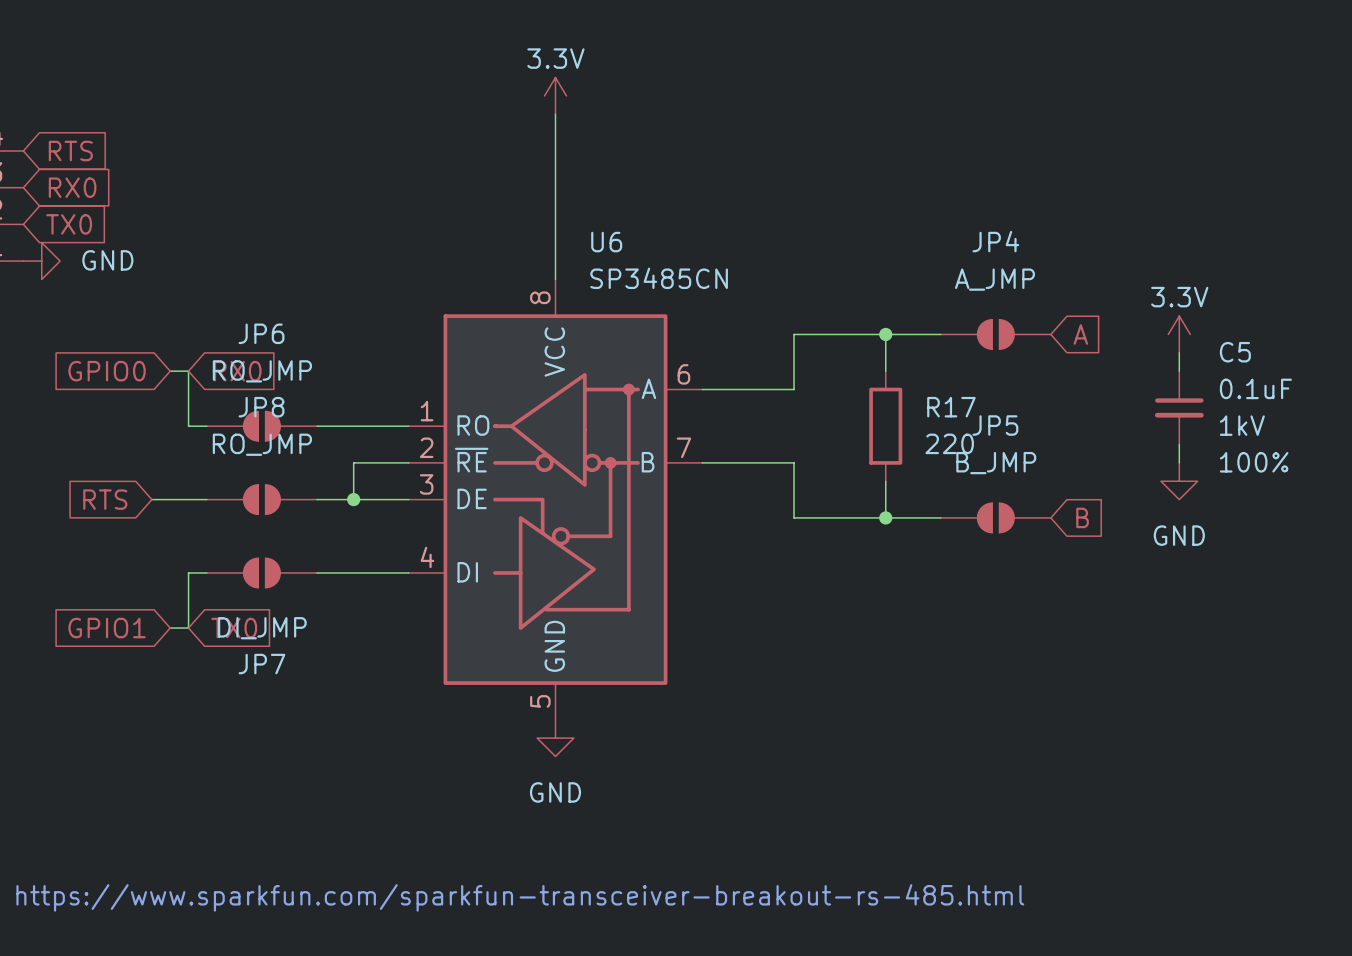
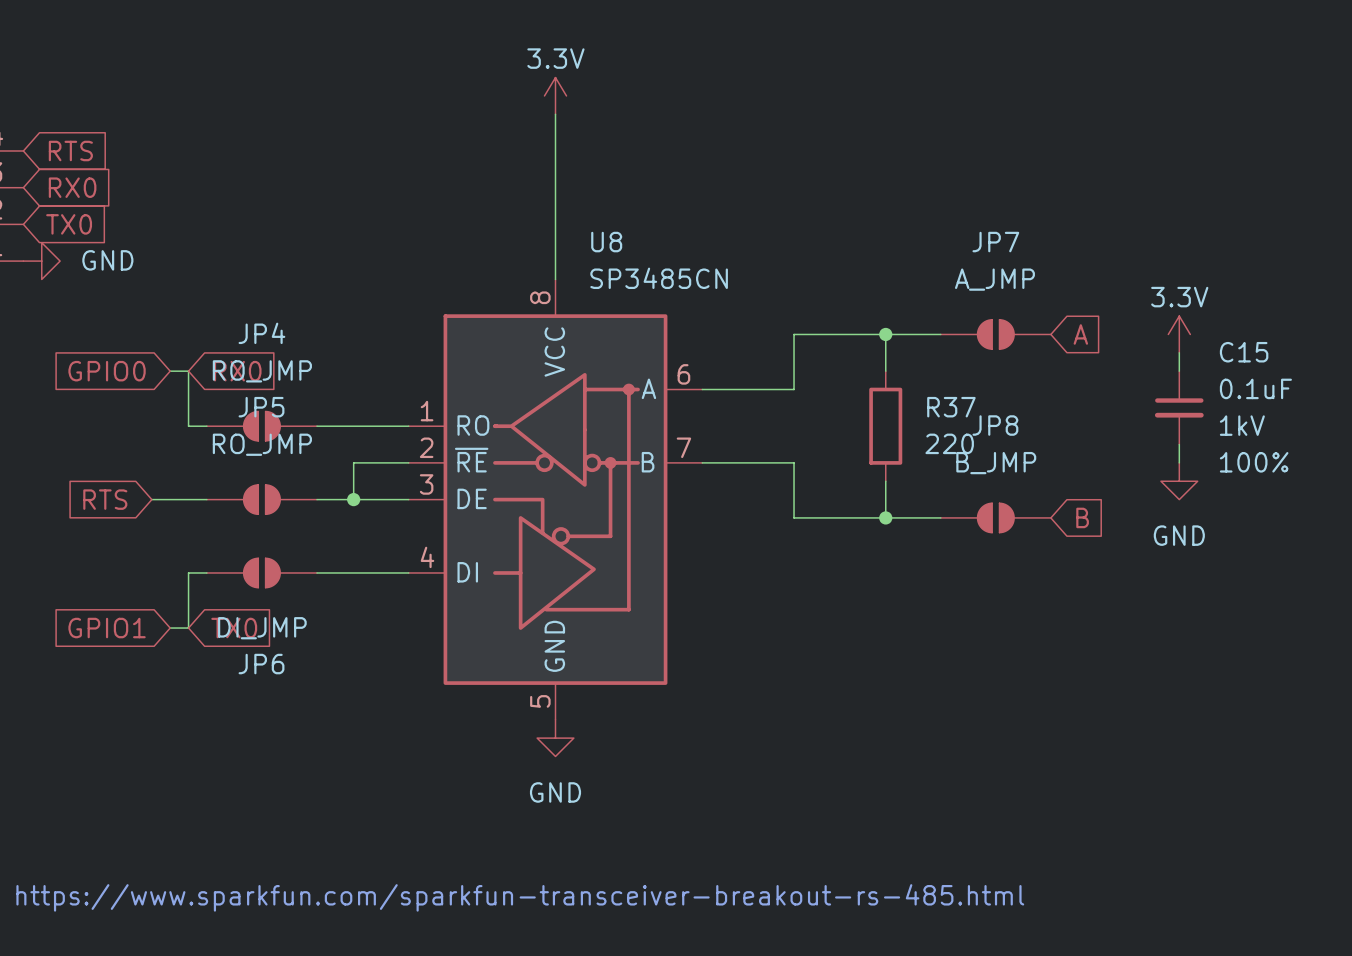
JP4 name: JP4 (995, 241) -> JP7 (995, 242)
U6 name: U6 (606, 242) -> U8 (606, 242)
JP6 name: JP6 (261, 333) -> JP4 (261, 333)
C5 name: C5 (1235, 352) -> C15 (1244, 352)
JP8 name: JP8 (261, 407) -> JP5 (261, 407)
R17 name: R17 (951, 407) -> R37 (951, 407)
JP5 name: JP5 (995, 425) -> JP8 (995, 425)
JP7 name: JP7 (261, 664) -> JP6 (261, 664)

